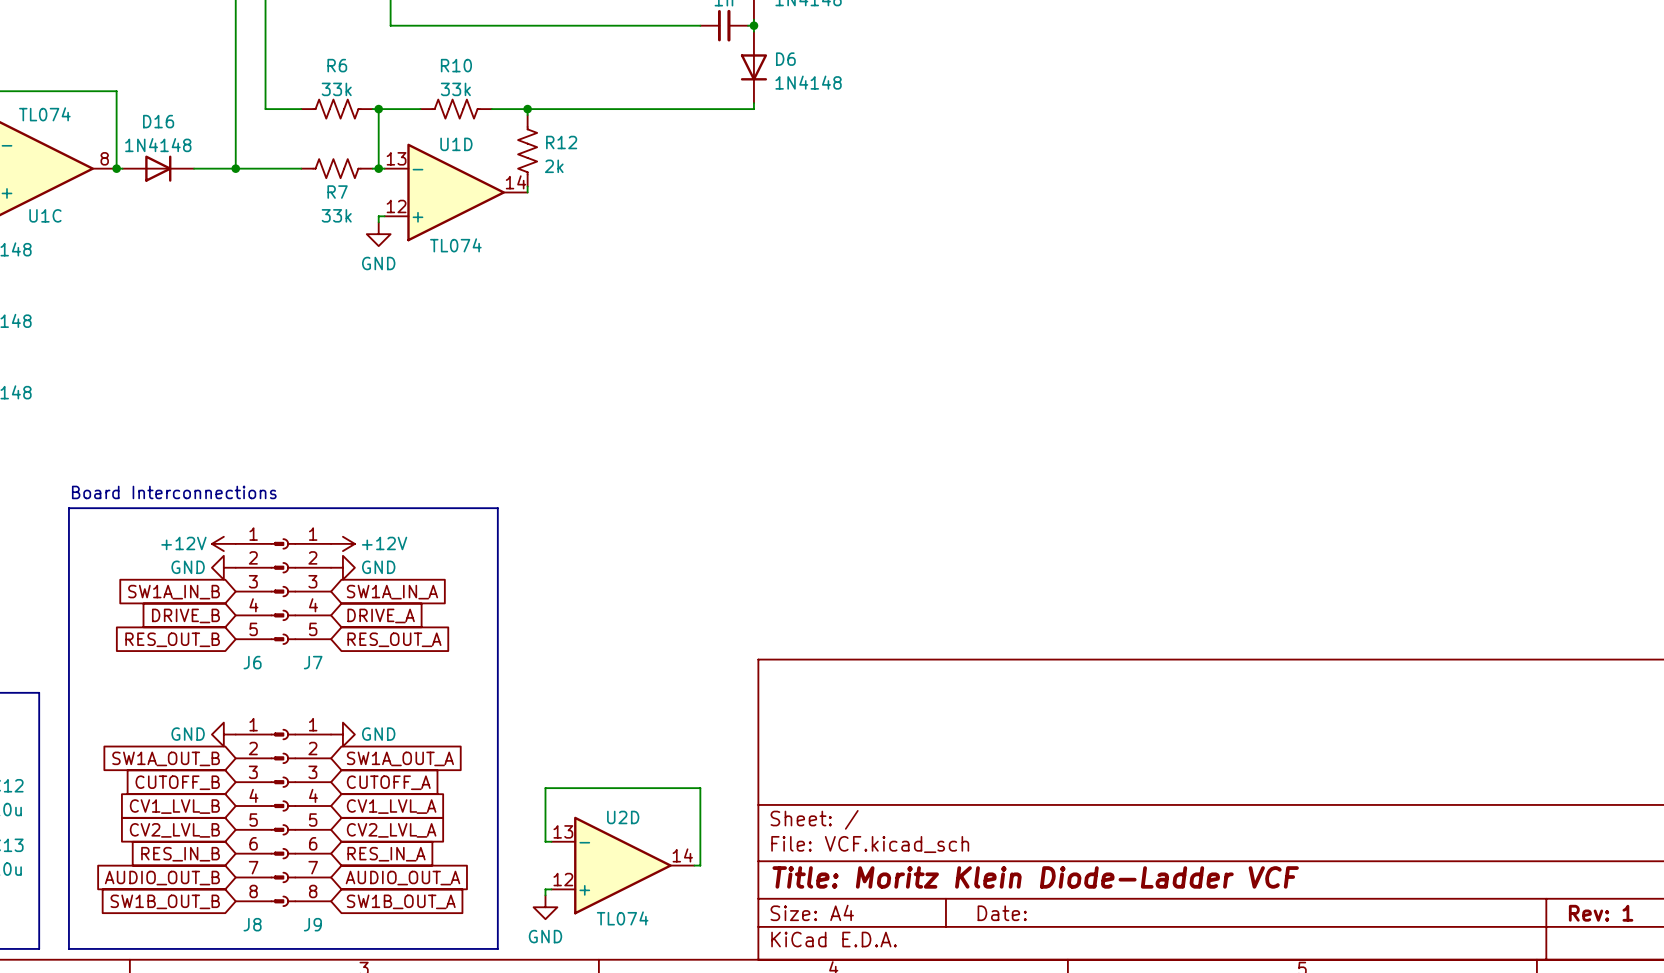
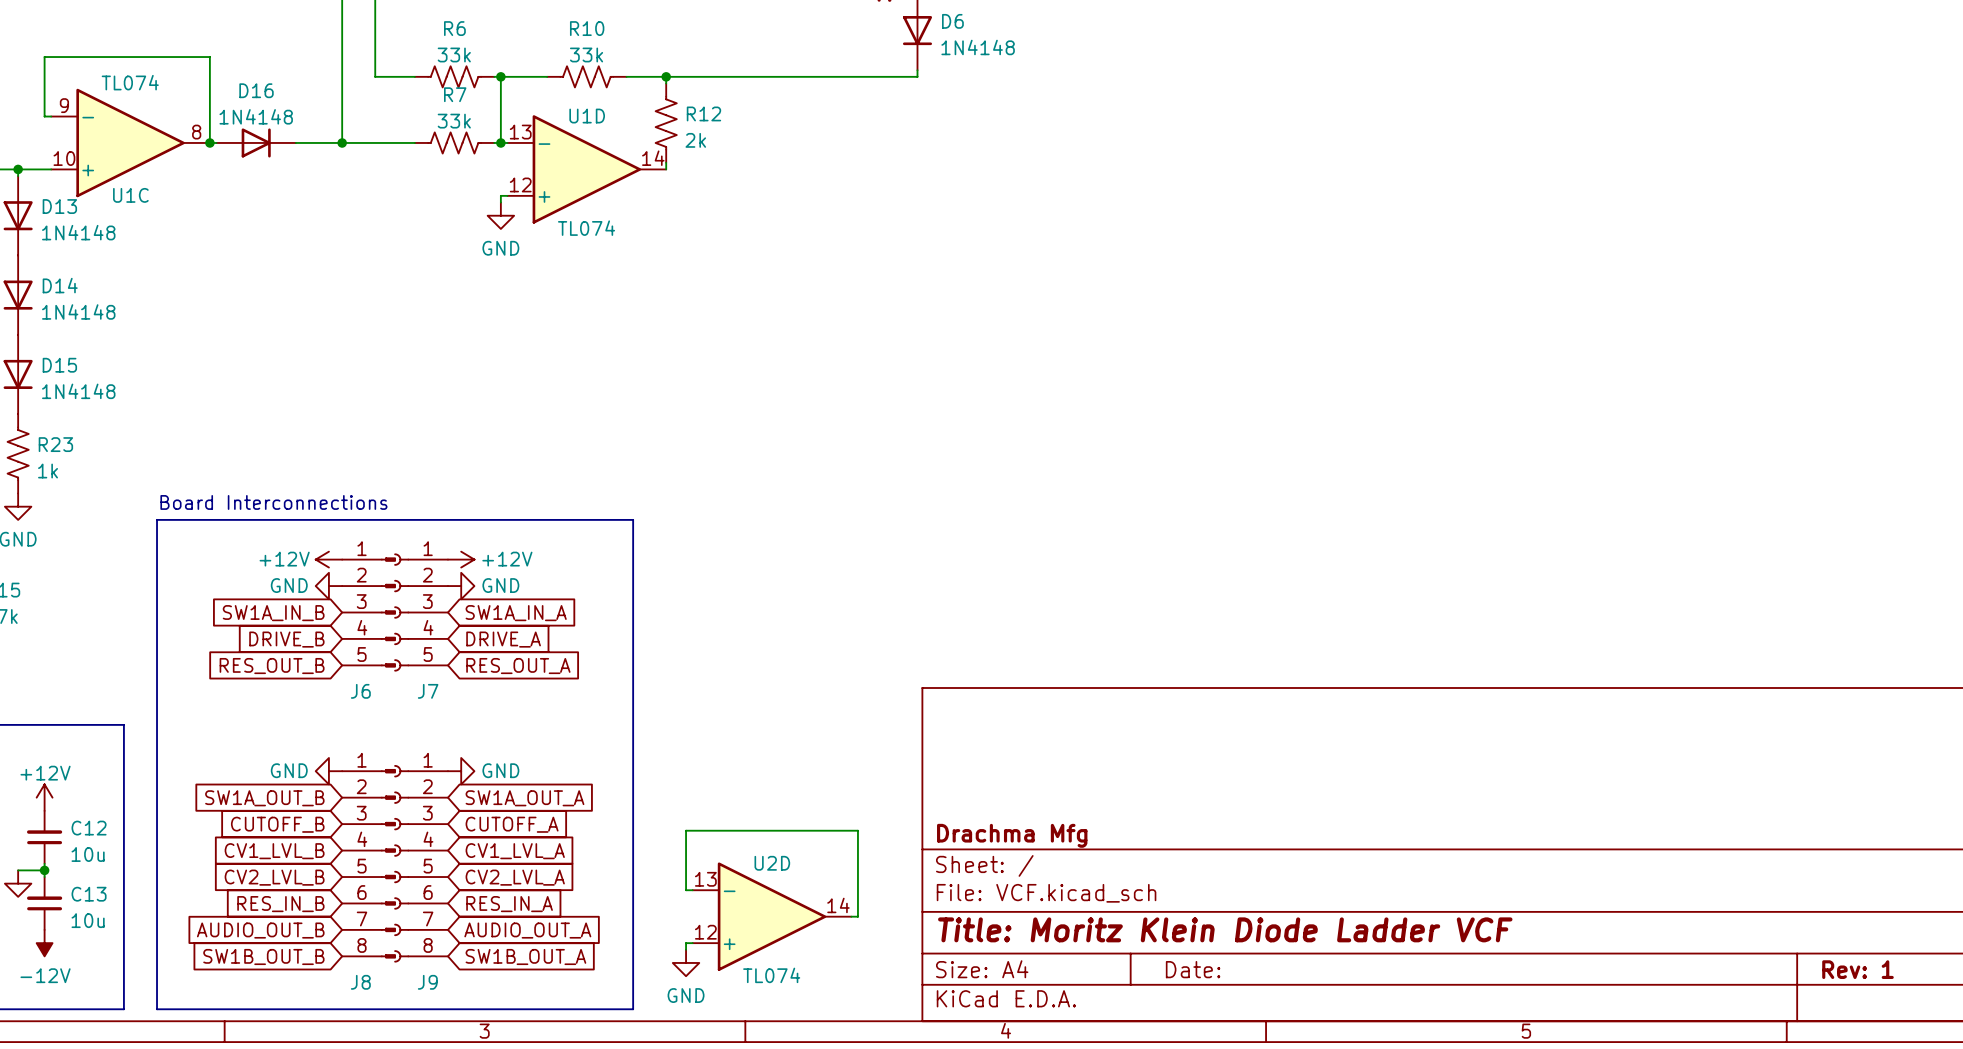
R7 name position: R7 (337, 192) -> R7 (455, 94)
R7 value position: 33k (336, 215) -> 33k (454, 121)
title block: none -> Drachma Mfg (1012, 835)
title block: Title: Moritz Klein Diode-Ladder VCF (1035, 877) -> Title: Moritz Klein Diode Ladder VCF (1225, 929)

